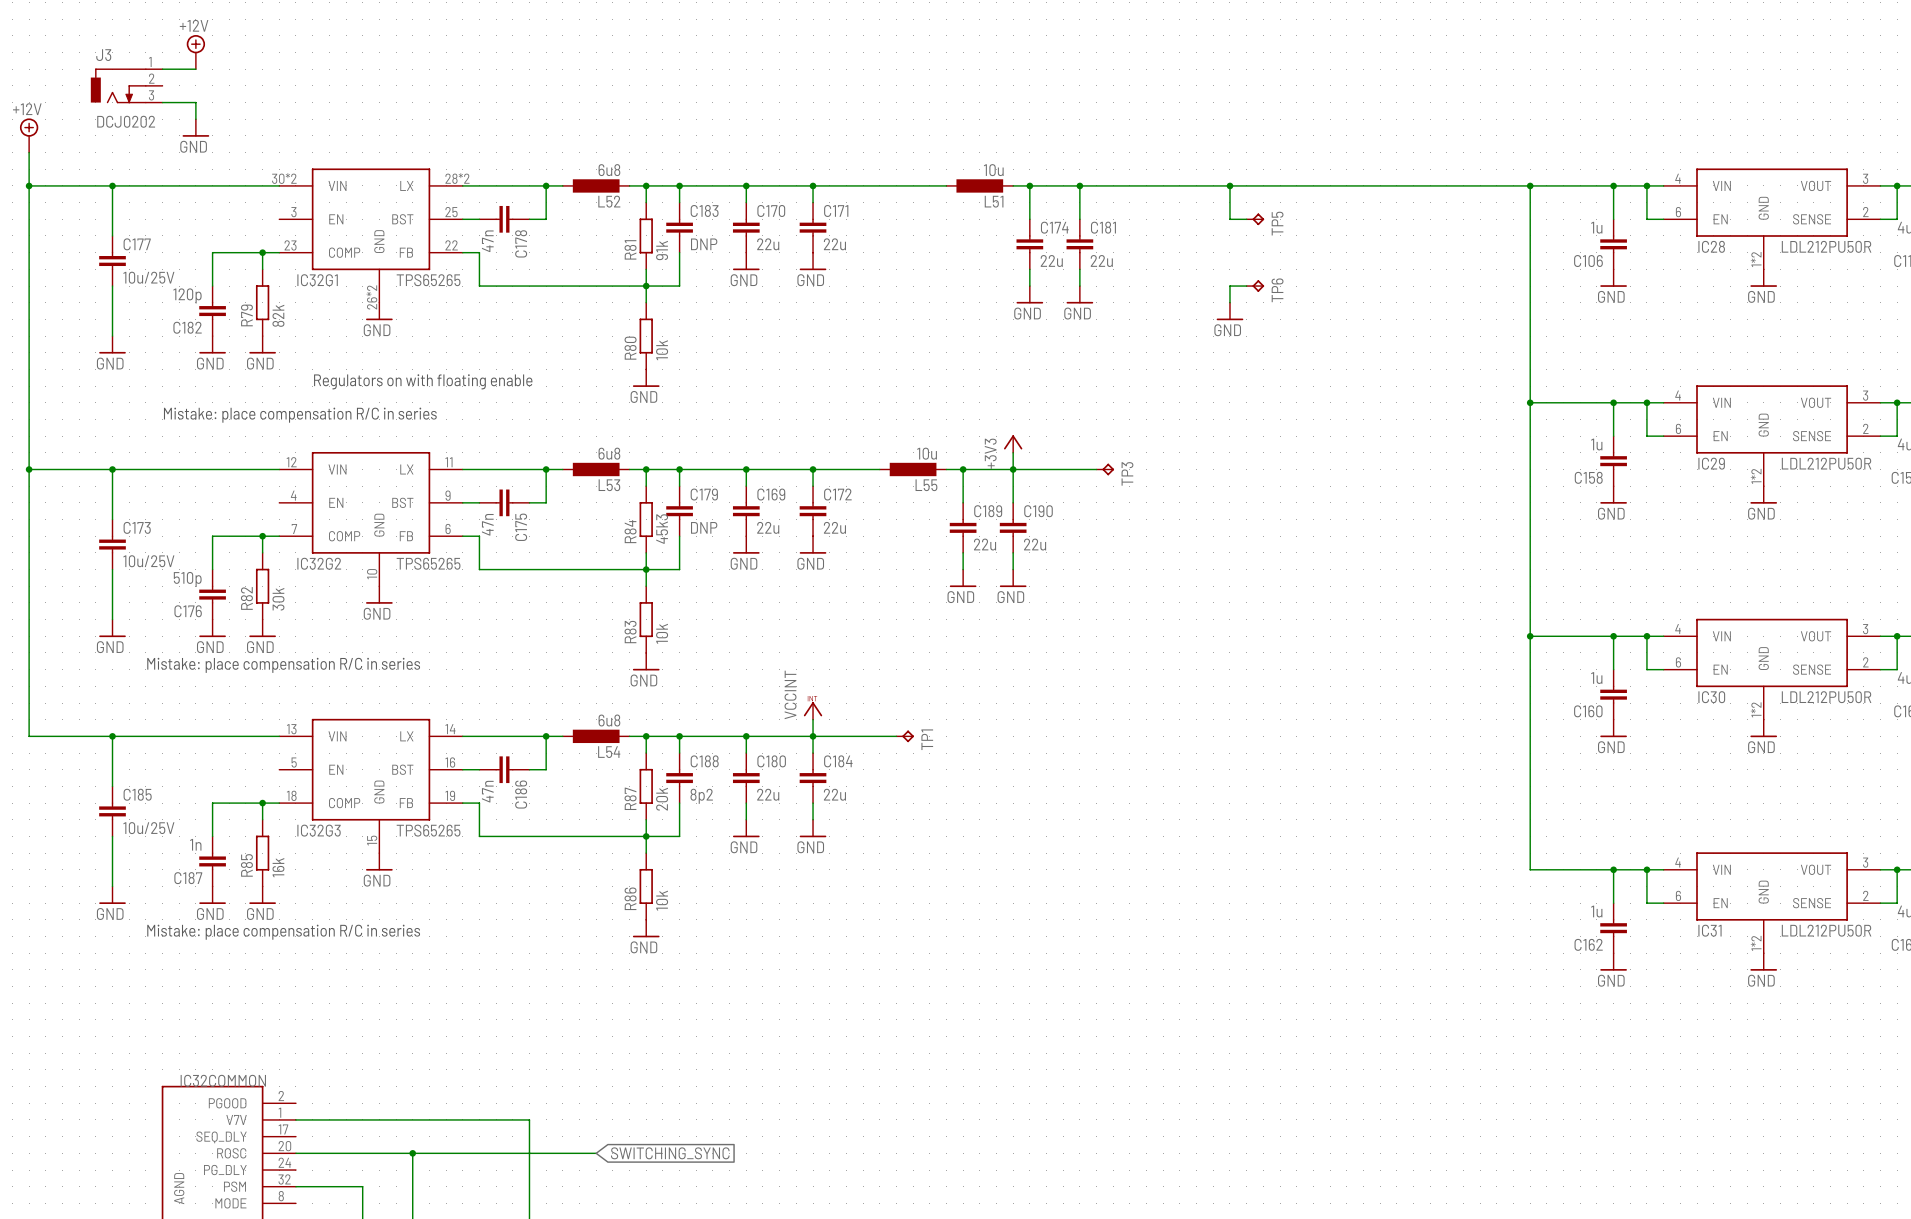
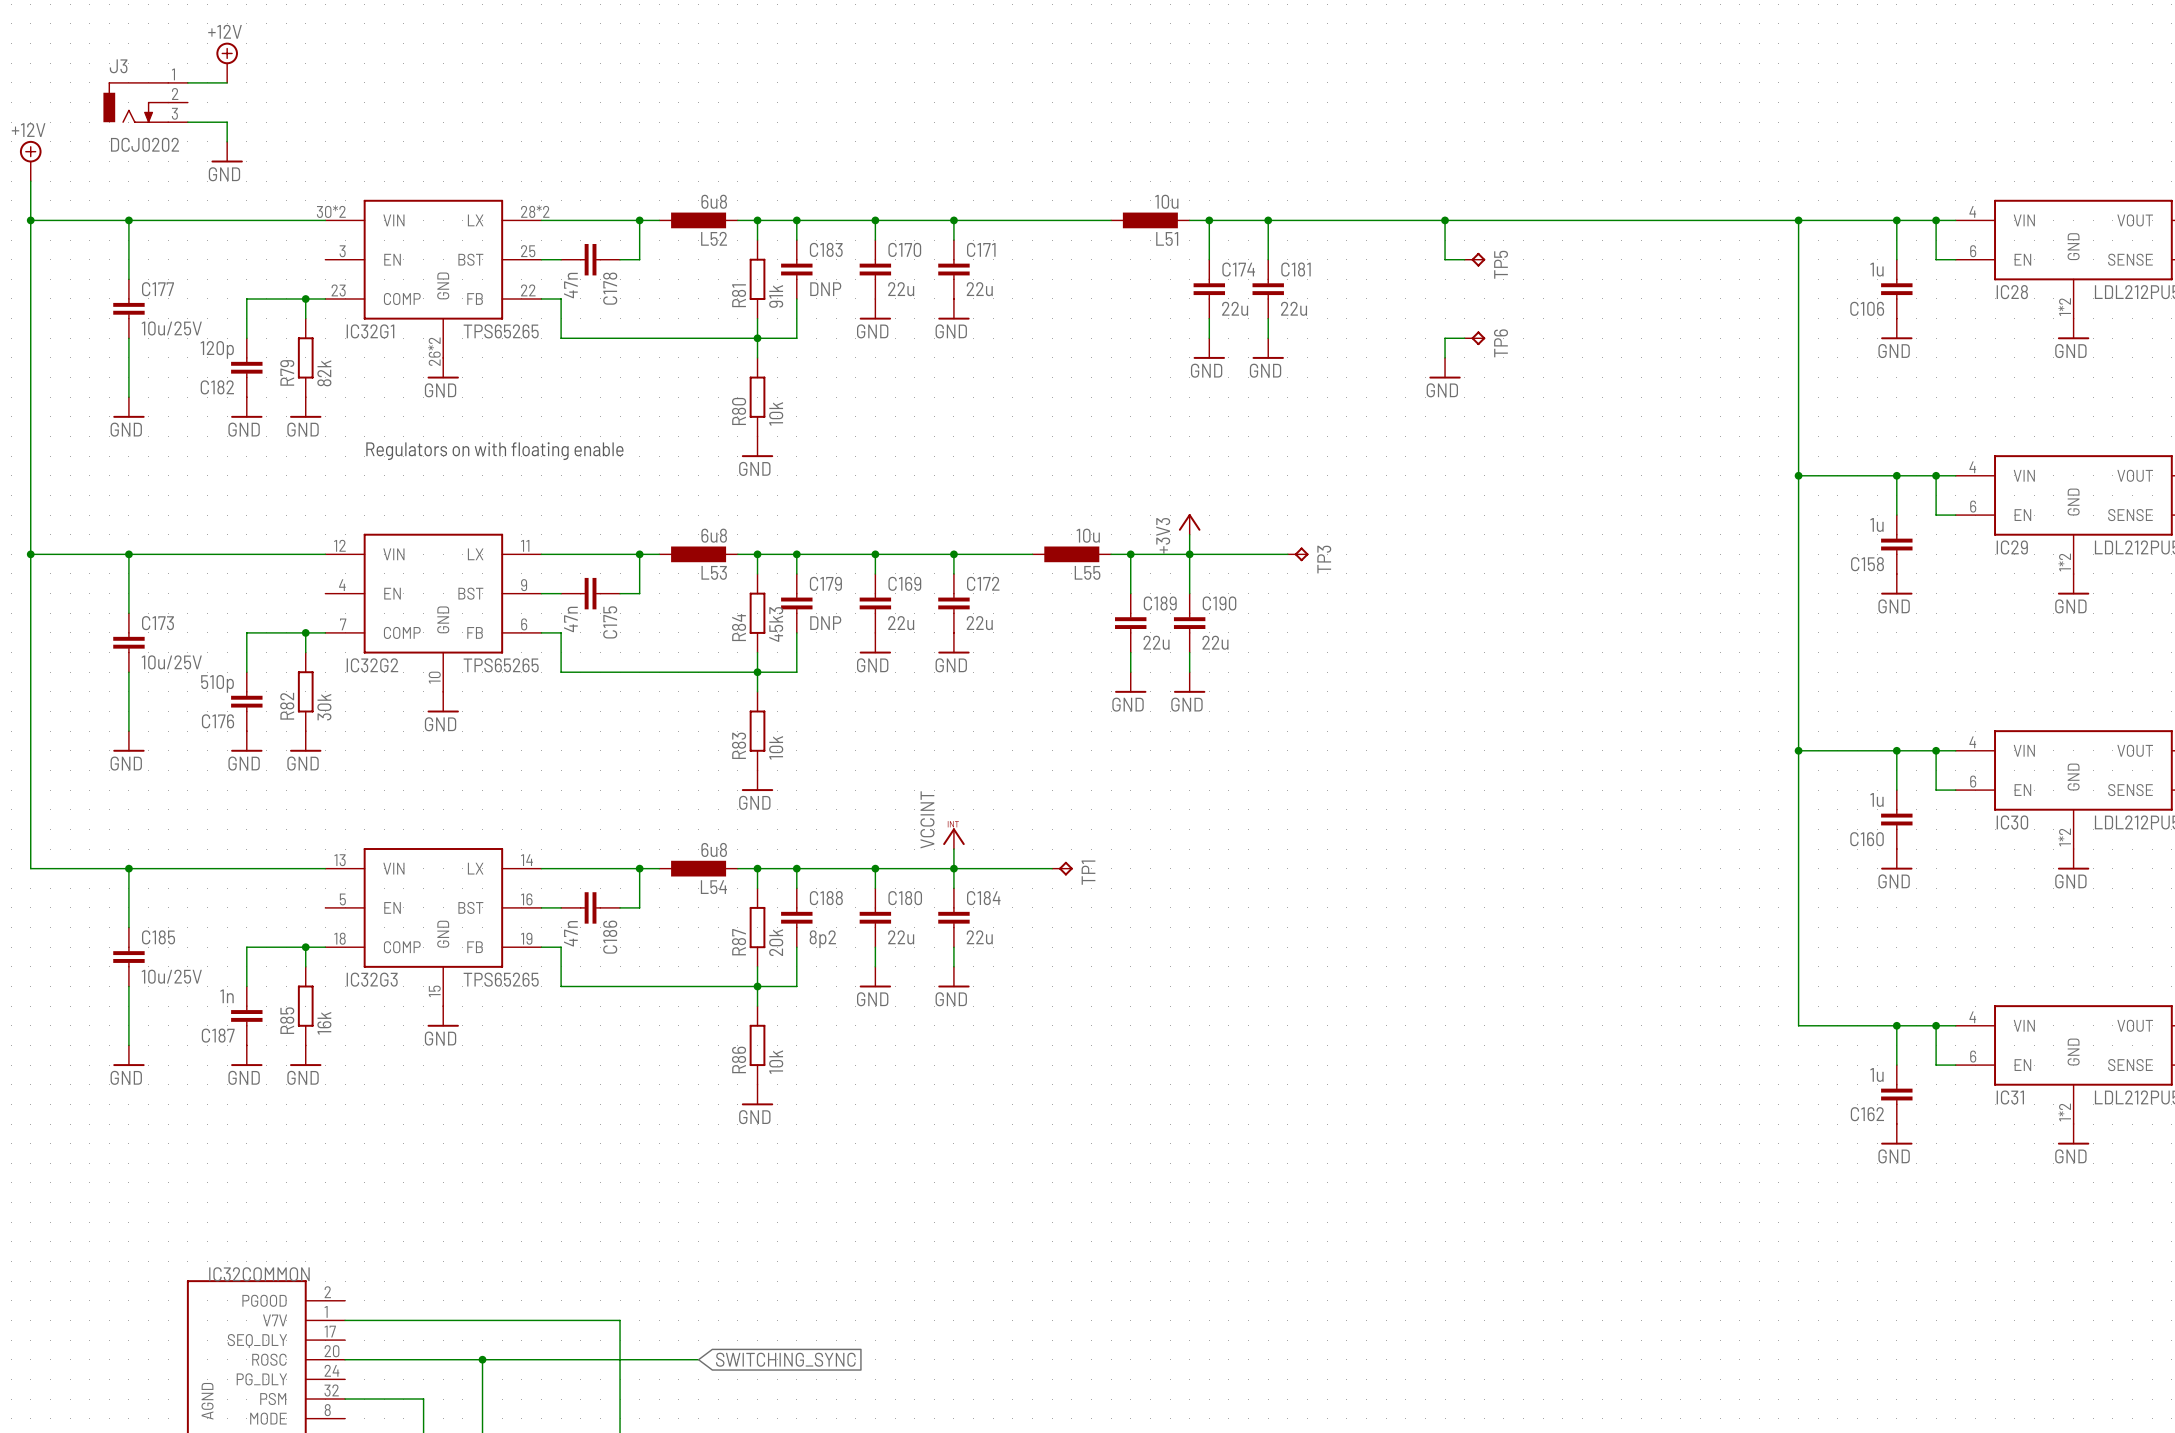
text: Mistake: place compensation R/C in series (300, 415) -> none
text: Mistake: place compensation R/C in series (283, 665) -> none
text: Mistake: place compensation R/C in series (283, 932) -> none

